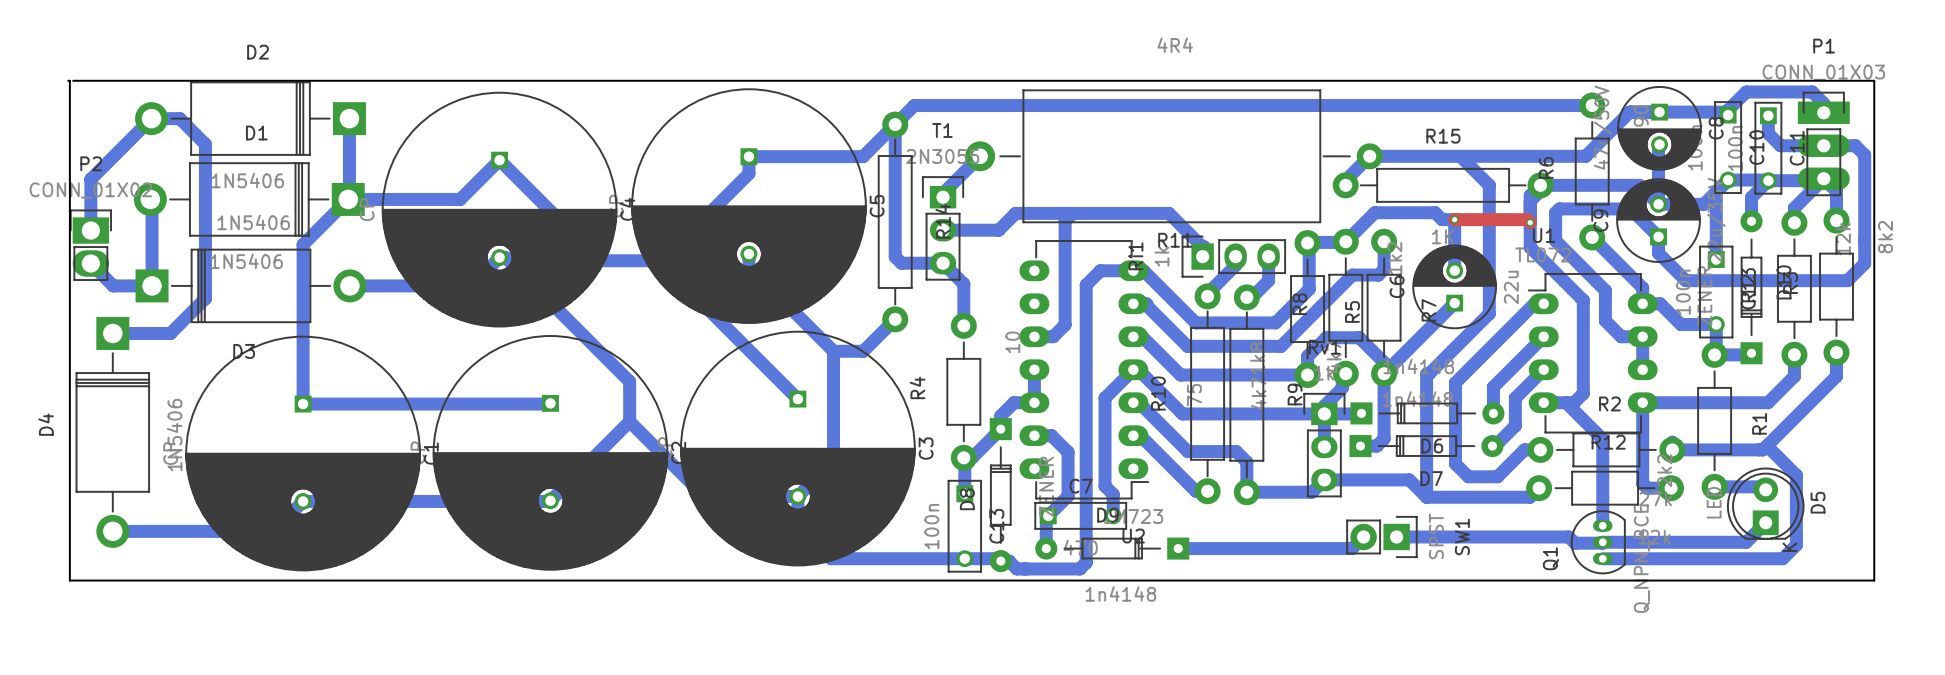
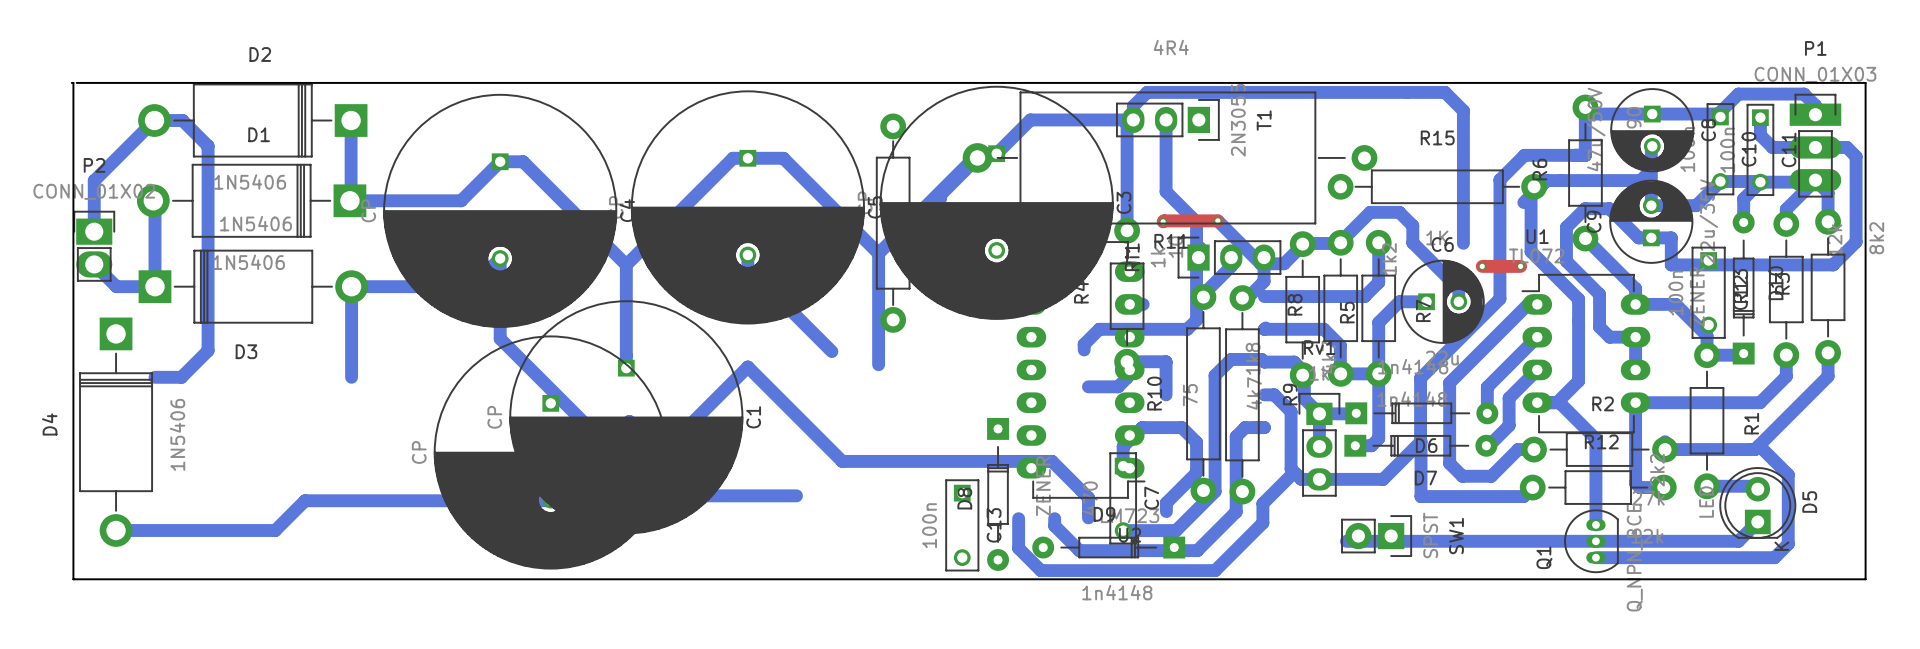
bottom track: (1592, 105) (914, 105) (895, 124) -> none
bottom track: (1629, 112) (1585, 156) (1369, 156) (1345, 180) (1345, 185) -> (1622, 114) (1587, 114) (1585, 116) (1585, 155) (1524, 155) (1499, 179) (1499, 298) (1420, 378) (1420, 441)
bottom track: none -> (1133, 119) (1127, 126) (1127, 230)
bottom track: none -> (1133, 119) (1030, 119) (996, 153) (978, 153) (878, 253)
bottom track: none -> (1133, 119) (1133, 106) (1147, 92) (1445, 92) (1463, 110) (1463, 243)
bottom track: none -> (1166, 119) (1166, 191) (1196, 222) (1196, 320) (1187, 329) (1099, 329) (1084, 344) (1084, 349)
bottom track: (748, 156) (748, 173) (660, 261) (797, 399) -> (747, 158) (733, 158) (626, 264)
bottom track: (784, 156) (863, 156) (895, 124) (895, 256) (901, 263) (943, 263) (963, 283) (963, 325) -> (783, 158) (878, 253)
bottom track: (1460, 156) (1489, 185) (1489, 313) (1428, 374) (1426, 374) (1426, 441) -> none
bottom track: (499, 160) (600, 260) (661, 260) -> (500, 161) (523, 161) (626, 264)
bottom track: none -> (1651, 169) (1640, 180) (1546, 180) (1531, 196) (1531, 251) (1578, 299) (1578, 381) (1556, 402)
bottom track: (1716, 191) (1716, 259) -> none
bottom track: (348, 199) (303, 244) (303, 404) (550, 403) -> none
bottom track: (1658, 204) (1639, 185) (1540, 185) (1530, 195) (1530, 247) (1583, 300) (1583, 393) (1574, 402) (1566, 402) -> none
bottom track: (1073, 213) (1065, 221) (1065, 324) (1053, 336) (1034, 336) -> none
top track: none -> (1217, 220) (1163, 221)
via: none -> (1217, 220)
top track: (1454, 219) (1527, 219) (1530, 222) -> none
via: (1454, 219) -> none
via: none -> (1163, 221)
via: (1530, 222) -> none
T1 rotation: 0° (943, 228) -> 90° clockwise (1167, 119)
T1 position: (943, 228) -> (1167, 119)
bottom track: (943, 230) (998, 230) (1015, 213) (1169, 213) (1202, 247) (1202, 256) -> none
bottom track: (1864, 240) (1864, 263) (1847, 280) (1685, 280) (1658, 253) (1658, 236) (1630, 208) (1559, 208) (1555, 212) (1555, 240) (1605, 290) (1605, 320) (1621, 336) -> (1856, 241) (1833, 264) (1671, 264) (1671, 237) (1638, 237) (1609, 208) (1585, 208) (1566, 227) (1566, 261) (1599, 294) (1599, 327) (1609, 337) (1614, 337)
bottom track: (1345, 241) (1374, 212) (1435, 212) (1442, 219) (1454, 219) (1454, 270) -> none
bottom track: none -> (1340, 242) (1370, 212) (1399, 212) (1412, 225) (1412, 242) (1458, 288) (1458, 301)
bottom track: (1309, 242) (1309, 289) (1275, 322) (1195, 322) (1143, 270) (1100, 270) (1086, 284) (1086, 562) (1079, 568) (1016, 568) (1009, 561) (1000, 561) (998, 558) (831, 558) (797, 525) (797, 496) (833, 460) (833, 351) (863, 351) (895, 319) -> (1304, 243) (1284, 263) (1260, 263) (1217, 220)
bottom track: none -> (878, 253) (878, 364)
bottom track: (499, 257) (505, 257) (629, 381) (629, 421) -> (500, 258) (500, 338) (626, 464) (649, 464) (747, 366) (842, 461) (1052, 461) (1088, 497) (1088, 517)
bottom track: none -> (626, 264) (626, 368)
top track: none -> (1482, 266) (1520, 266)
via: none -> (1482, 266)
via: none -> (1520, 266)
bottom track: (1384, 269) (1378, 275) (1352, 275) (1281, 346) (1187, 346) (1144, 303) -> (1378, 270) (1378, 282) (1364, 296) (1264, 296)
bottom track: none -> (351, 286) (351, 377)
C6 rotation: 0° (1454, 286) -> 90° clockwise (1442, 301)
bottom track: (205, 298) (170, 333) (112, 333) -> (208, 299) (208, 350) (181, 377) (155, 377)
bottom track: (1454, 303) (1384, 373) -> (1265, 328) (1264, 329) (1324, 329) (1340, 345) (1341, 373) (1378, 373)
bottom track: (1660, 303) (1680, 324) (1716, 324) (1716, 353) (1714, 354) -> (1652, 304) (1675, 304) (1707, 335) (1707, 355)
bottom track: (1133, 336) (1142, 336) (1180, 375) (1307, 375) (1307, 356) (1326, 337) (1359, 337) (1384, 362) -> (1426, 301) (1399, 301) (1378, 322) (1378, 362)
bottom track: (1034, 369) (1034, 402) (1013, 402) (1000, 415) (1000, 429) (972, 457) (963, 457) (964, 493) -> none
bottom track: (1342, 375) (1342, 388) (1324, 406) (1324, 413) (1182, 413) (1138, 369) (1133, 369) (1105, 398) (1105, 486) (1113, 494) (1113, 515) -> none
bottom track: none -> (1088, 386) (1118, 386) (1127, 377) (1127, 361) (1165, 361) (1166, 394)
R4 position: (963, 391) -> (1127, 296)
bottom track: (1133, 402) (1138, 402) (1187, 451) (1236, 451) (1246, 462) (1246, 492) (1312, 492) (1324, 479) -> (1264, 394) (1274, 394) (1291, 411) (1291, 469) (1301, 479) (1319, 479)
bottom track: none -> (1319, 413) (1304, 398) (1304, 372) (1294, 362) (1231, 359) (1215, 375) (1215, 491) (1176, 530) (1123, 530)
bottom track: none -> (1264, 427) (1245, 427) (1236, 436) (1236, 511) (1197, 550) (1079, 550) (1054, 525) (1054, 518)
bottom track: (1034, 435) (1051, 435) (1068, 452) (1068, 496) (1046, 517) (1046, 548) -> none
bottom track: (1133, 435) (1140, 435) (1195, 491) (1207, 491) -> none
C3 position: (797, 448) -> (996, 202)
C1 position: (303, 453) -> (626, 417)
bottom track: none -> (1123, 466) (1123, 446) (1142, 427) (1181, 427) (1196, 442) (1196, 472) (1166, 502) (1166, 511)
bottom track: none -> (1296, 474) (1292, 474) (1262, 503) (1262, 522) (1215, 570) (1040, 570) (1018, 548) (1018, 518)
bottom track: (1388, 479) (1409, 479) (1426, 497) -> (1383, 479) (1420, 441)
C7 rotation: 0° (1080, 515) -> 90° clockwise (1123, 498)
bottom track: (1363, 536) (1352, 548) (1178, 548) -> none
bottom track: (1396, 536) (1568, 536) (1574, 543) (1602, 542) -> (1346, 541) (1595, 541)

